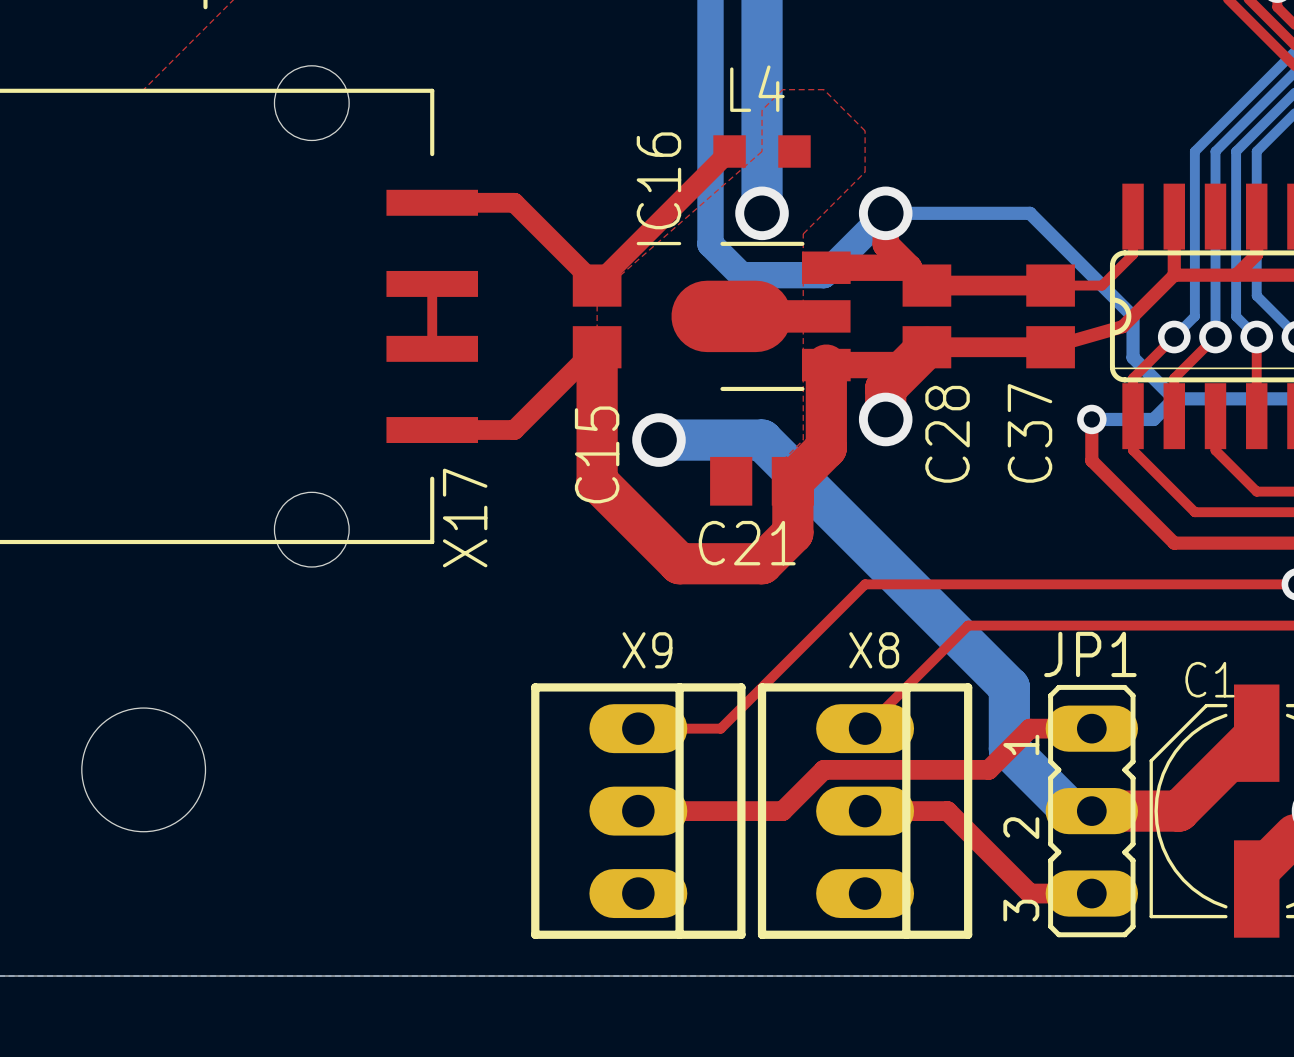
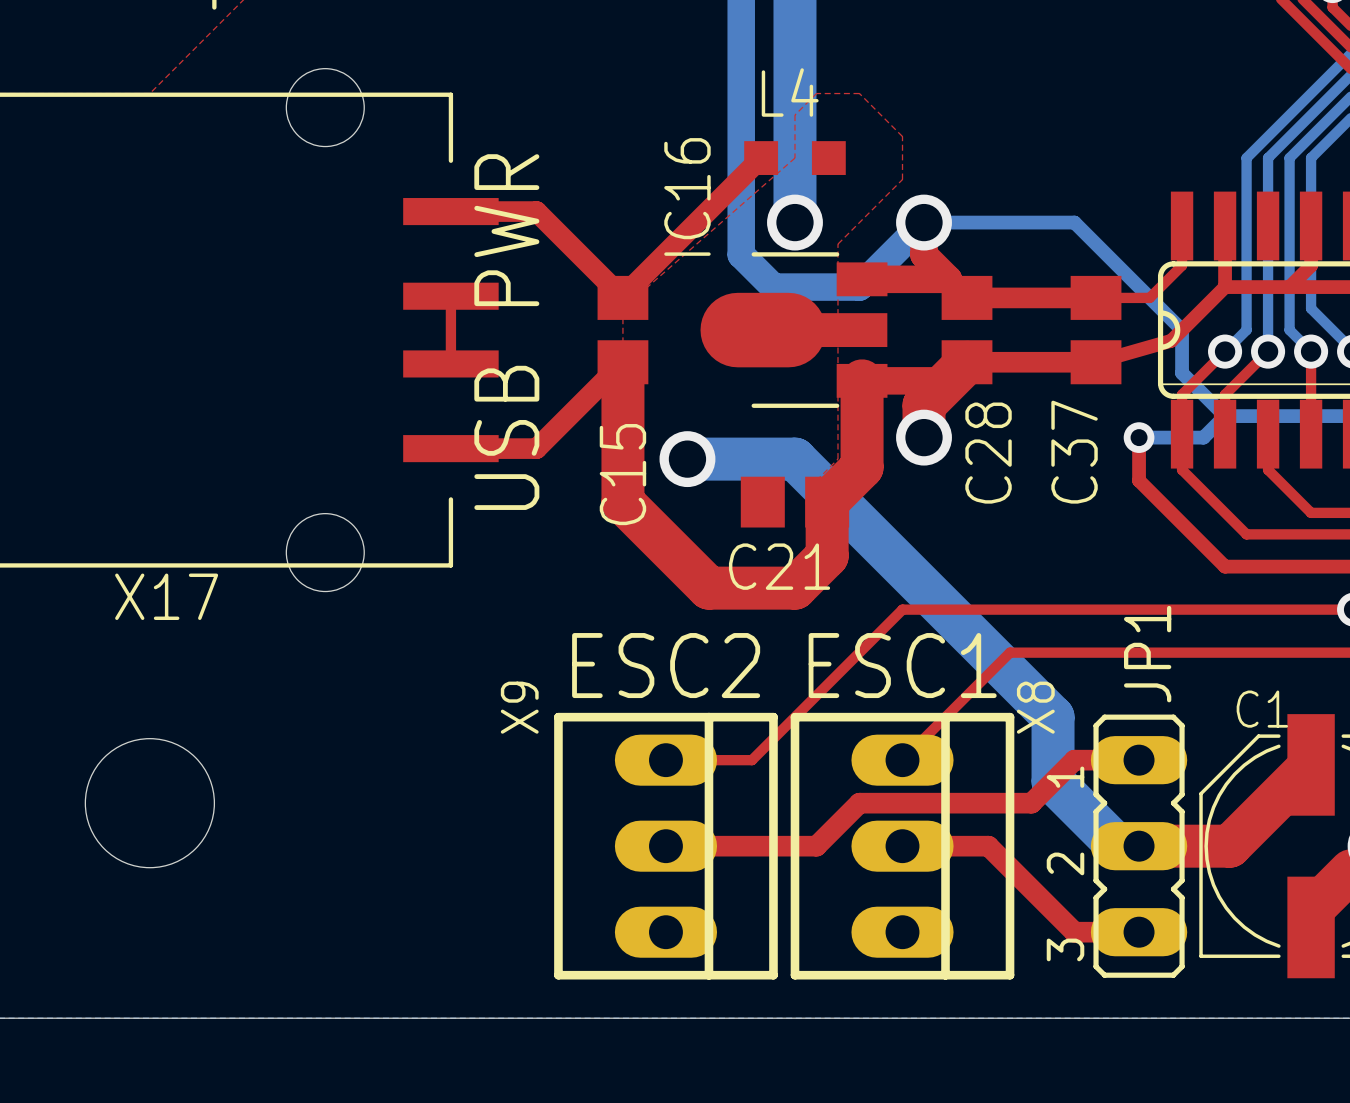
text: none -> USB PWR (506, 332)
X17 name rotation: 0° (465, 517) -> 90° clockwise (166, 596)
X17 name position: X17 (465, 517) -> X17 (166, 596)
text: none -> ESC2 (666, 665)
text: none -> ESC1 (902, 665)
X9 name rotation: 0° (647, 650) -> 90° counterclockwise (519, 707)
X9 name position: X9 (647, 650) -> X9 (519, 707)
X8 name rotation: 0° (874, 650) -> 90° counterclockwise (1035, 707)
X8 name position: X8 (874, 650) -> X8 (1035, 707)
JP1 name rotation: 0° (1090, 654) -> 90° counterclockwise (1147, 654)

